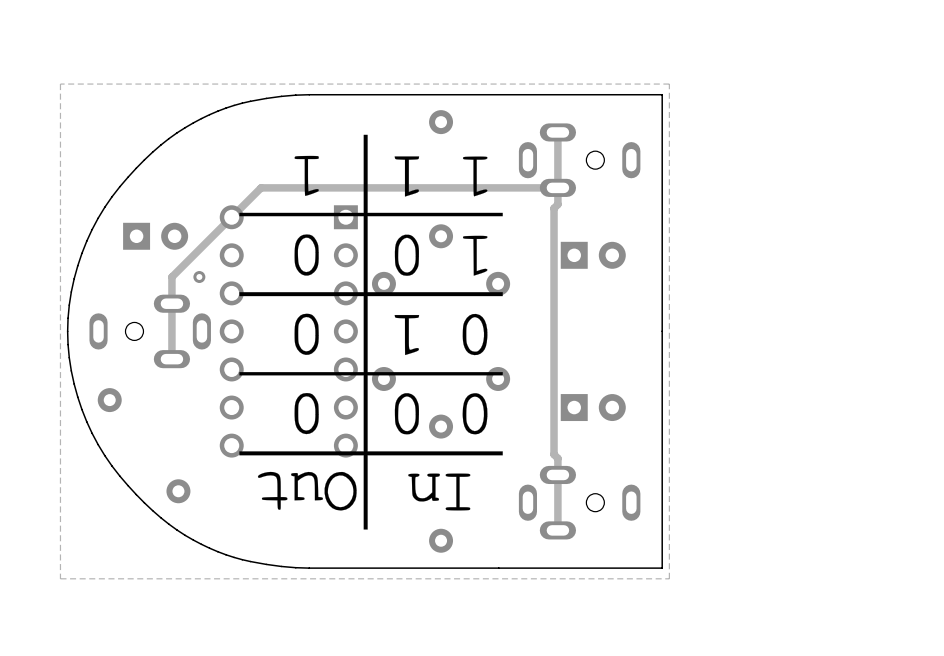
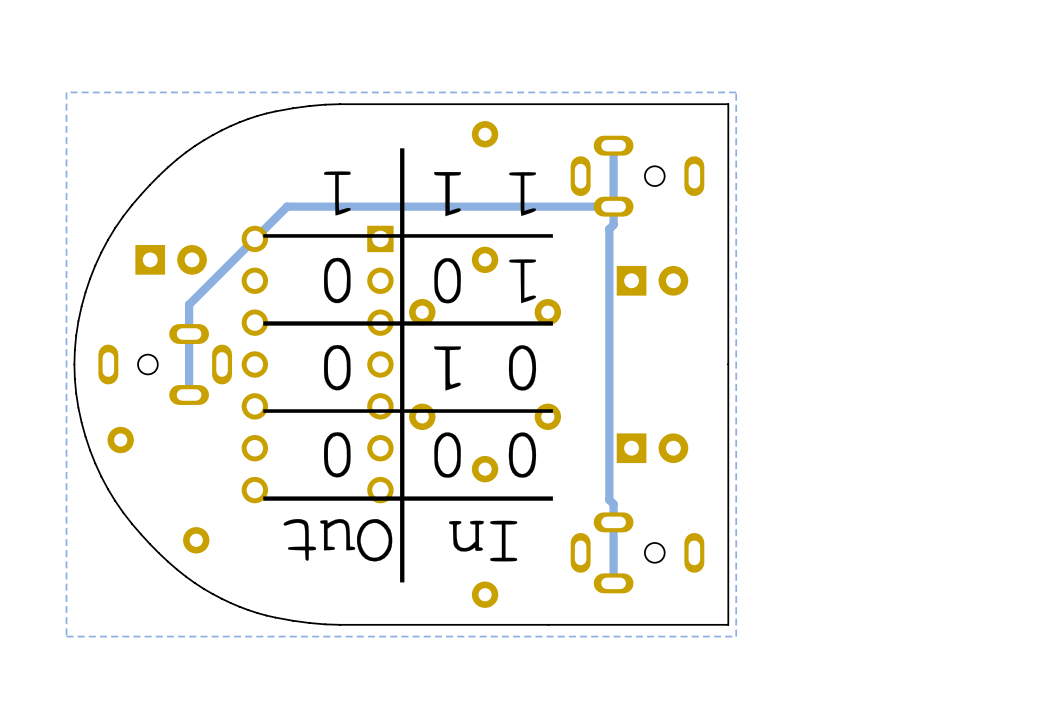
via: (199, 277) -> none

